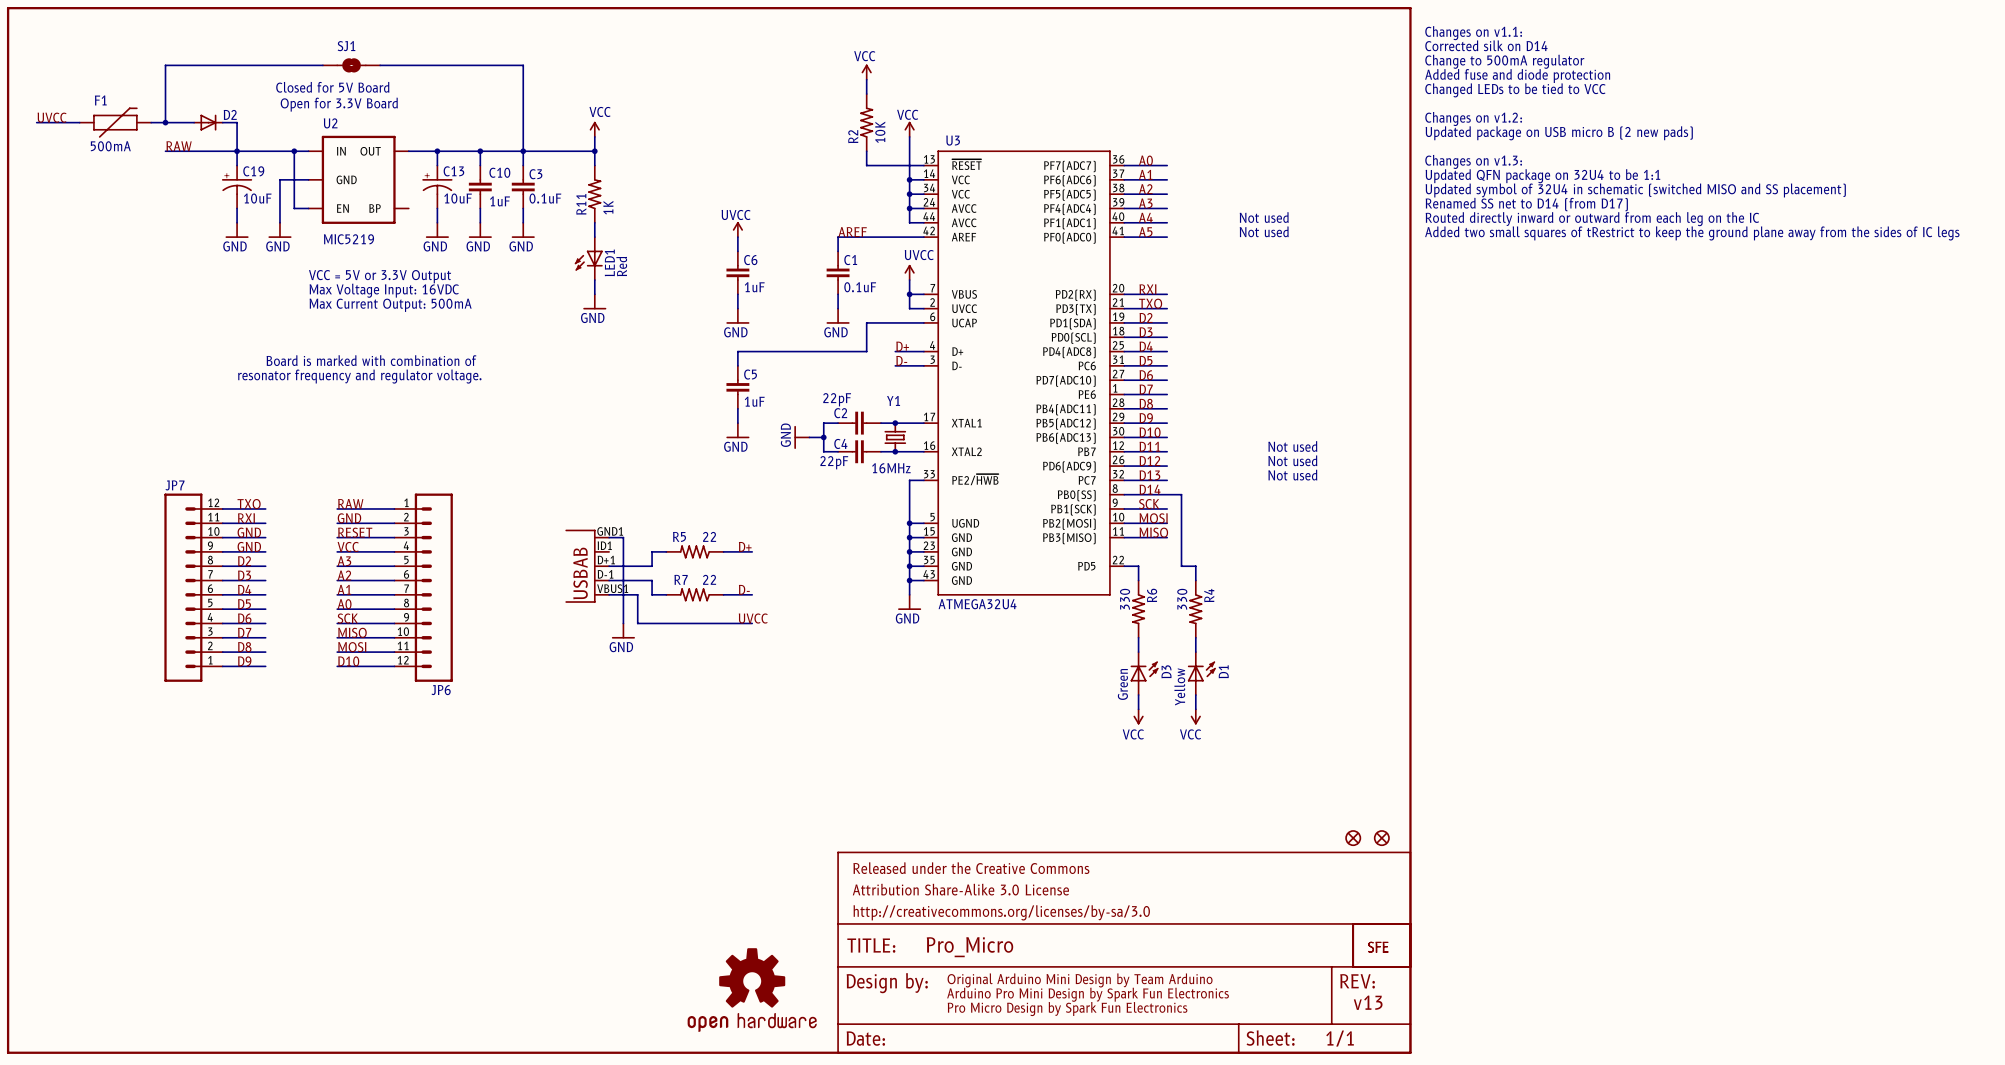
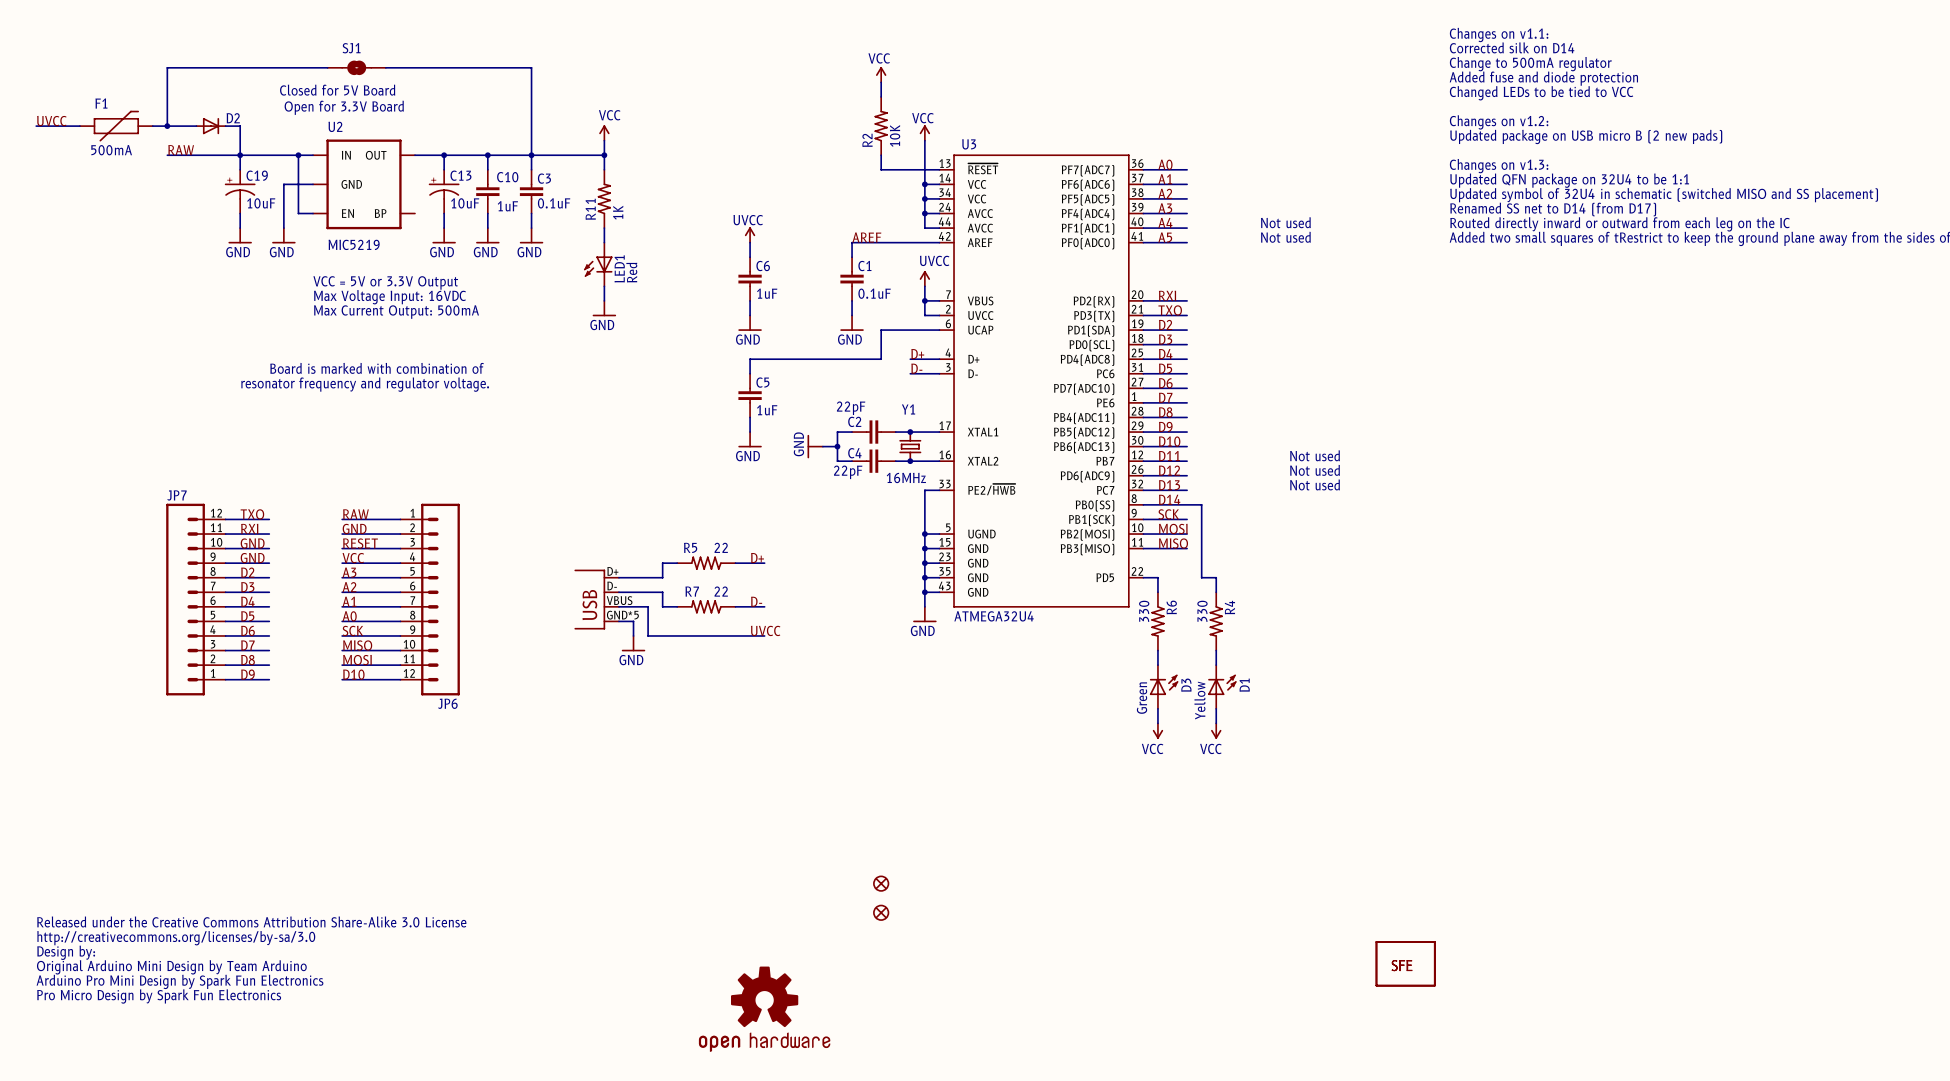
part: (709, 530) -> none
wire: (609, 537) (623, 537) (623, 609) -> (618, 621) (633, 621)
part: (587, 566) -> none
part: none -> (596, 599)
part: (1353, 838) -> none
part: (1381, 838) -> none
part: none -> (881, 883)
part: none -> (881, 912)
part: none -> (251, 938)
text: none -> Original Arduino Mini Design by Team Arduino (171, 967)
part: (1124, 952) -> none
text: none -> Arduino Pro Mini Design by Spark Fun Electronics (179, 981)
text: none -> Pro Micro Design by Spark Fun Electronics (159, 996)
text: Original Arduino Mini Design by Team Arduino (1080, 980) -> none
text: Arduino Pro Mini Design by Spark Fun Electronics (1088, 994) -> none
text: v13 (1368, 1002) -> none
text: Pro Micro Design by Spark Fun Electronics (1067, 1009) -> none

